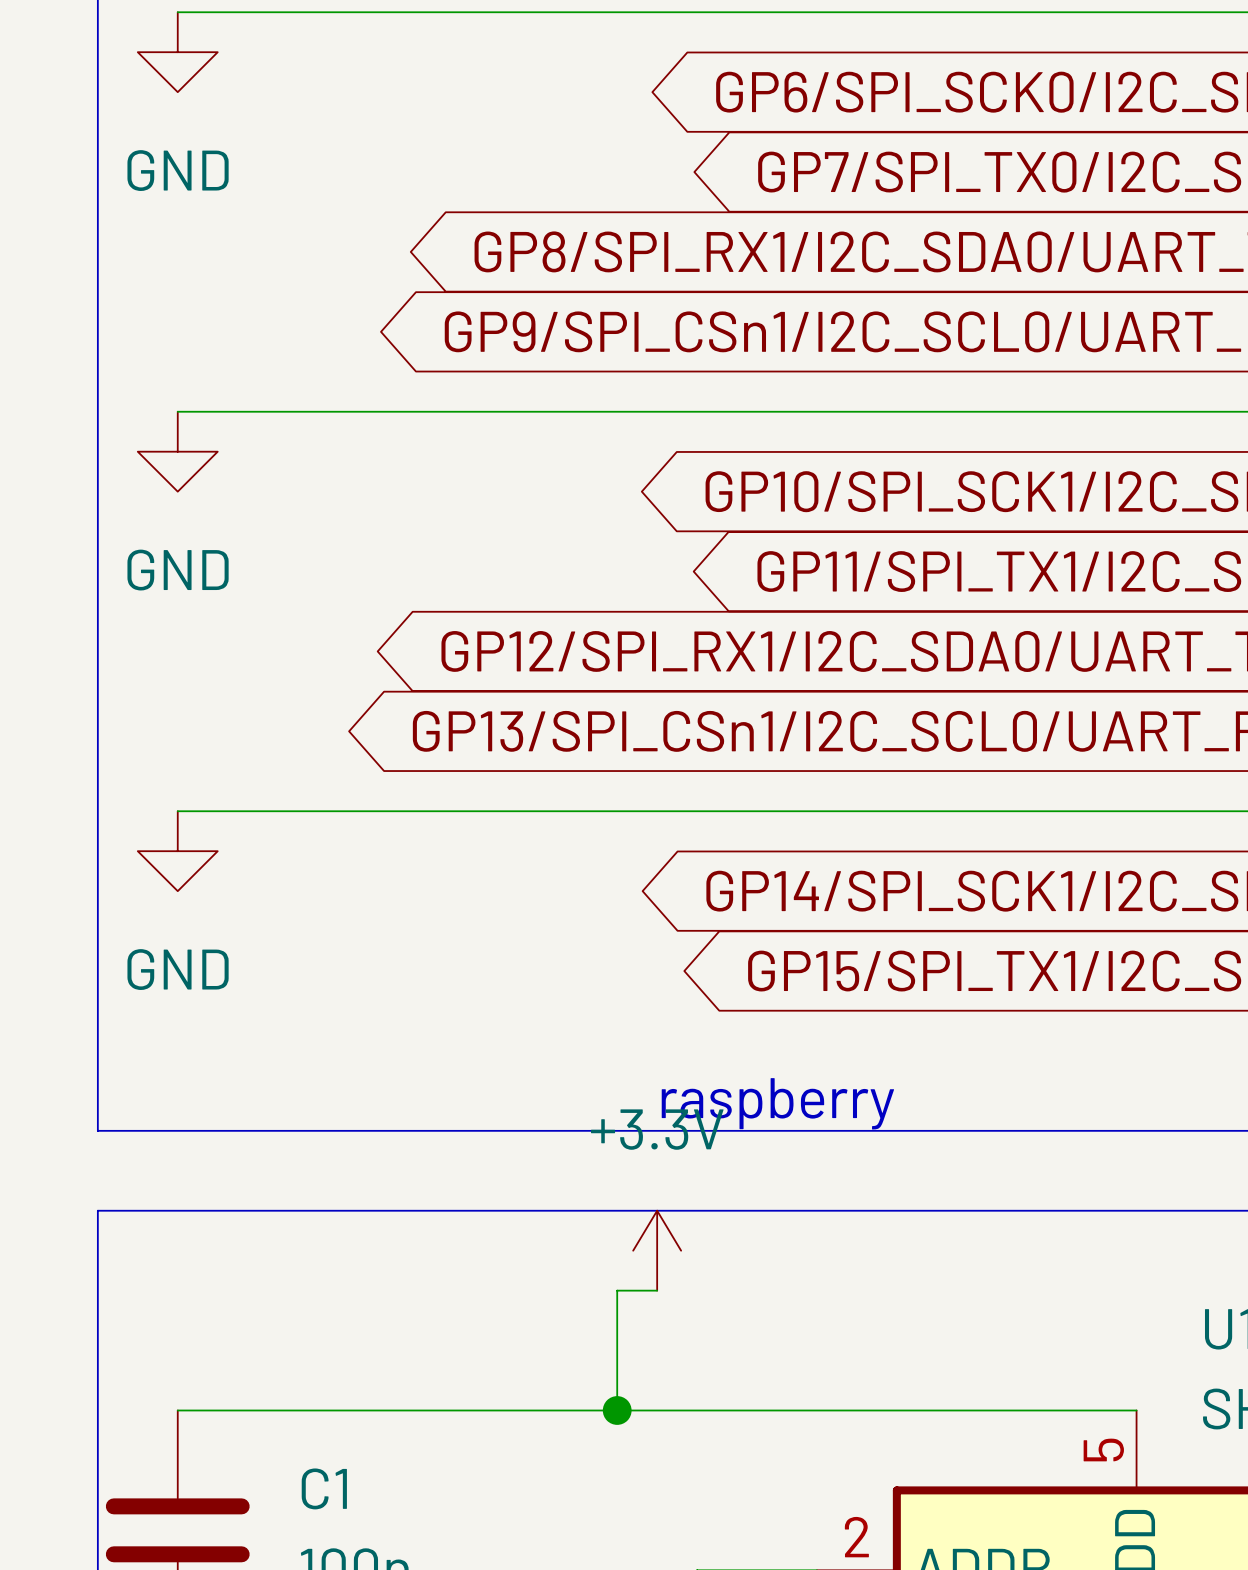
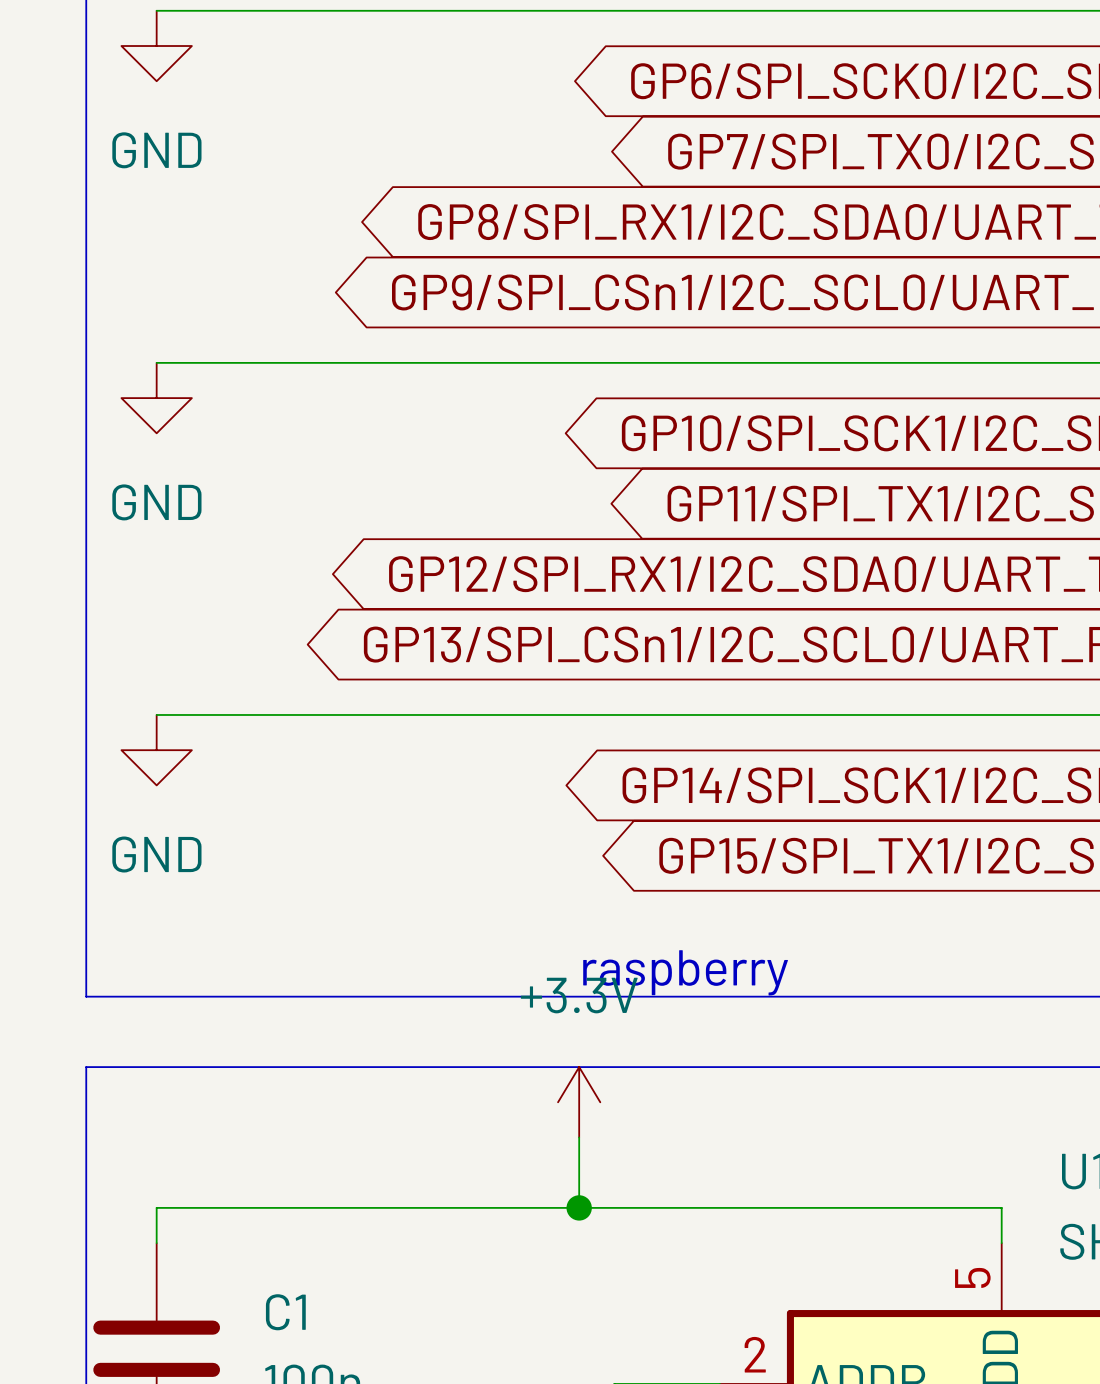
wire: (657, 1290) (617, 1290) (617, 1410) -> (579, 1137) (579, 1207)
wire: (177, 1410) (1136, 1410) -> (156, 1243) (156, 1207) (1001, 1207) (1001, 1243)
junction position: (617, 1410) -> (579, 1207)

